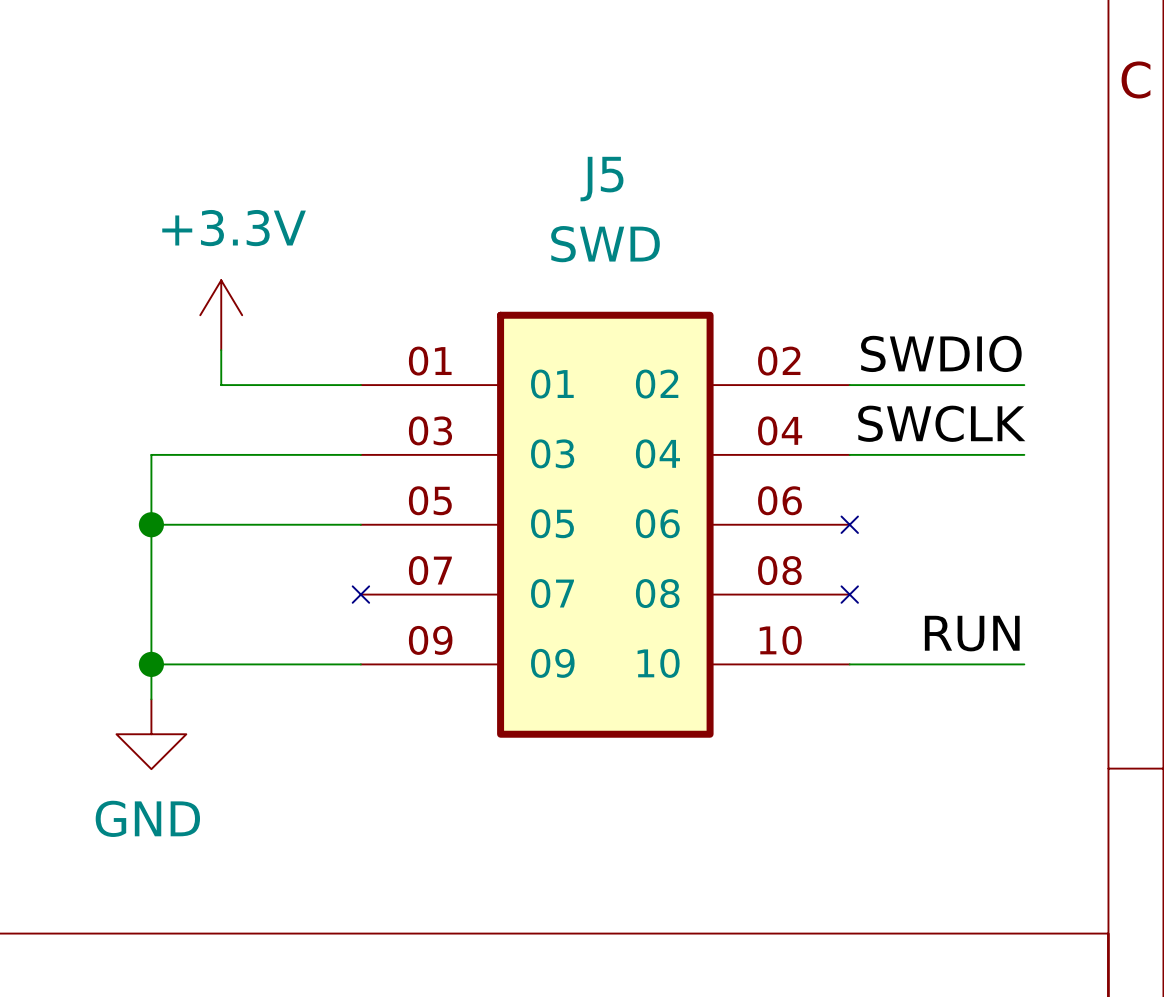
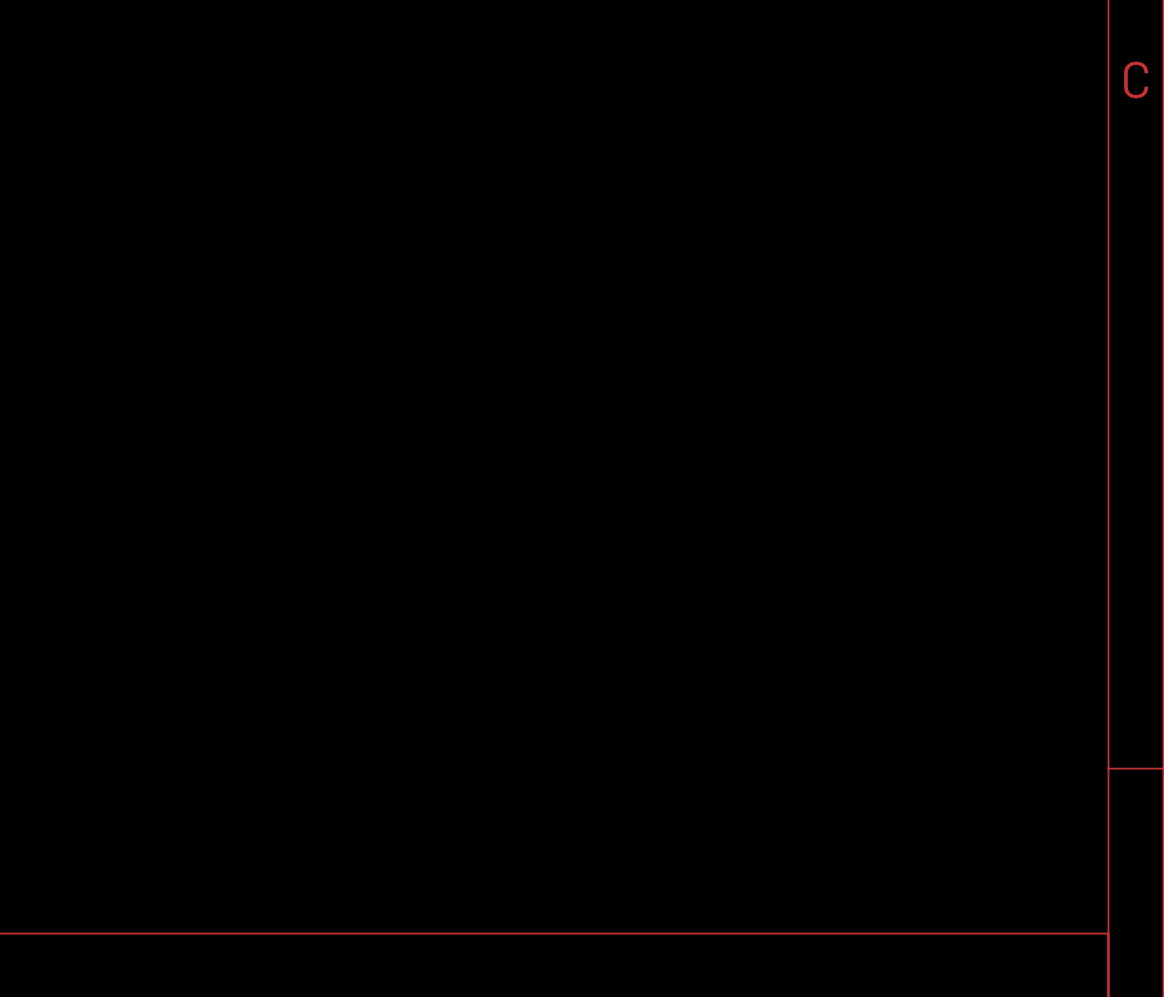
power symbol: +3.3V (221, 315) -> none
wire: (221, 350) (221, 385) (360, 385) -> none
label: SWDIO (941, 353) -> none
wire: (849, 385) (1024, 385) -> none
label: SWCLK (941, 423) -> none
wire: (360, 454) (151, 454) (151, 699) -> none
wire: (849, 454) (1024, 454) -> none
wire: (151, 524) (360, 524) -> none
junction: (151, 524) -> none
J5: SWD (605, 524) -> none
label: RUN (972, 633) -> none
wire: (151, 664) (360, 664) -> none
junction: (151, 664) -> none
wire: (849, 664) (1024, 664) -> none
power symbol: GND (151, 734) -> none

